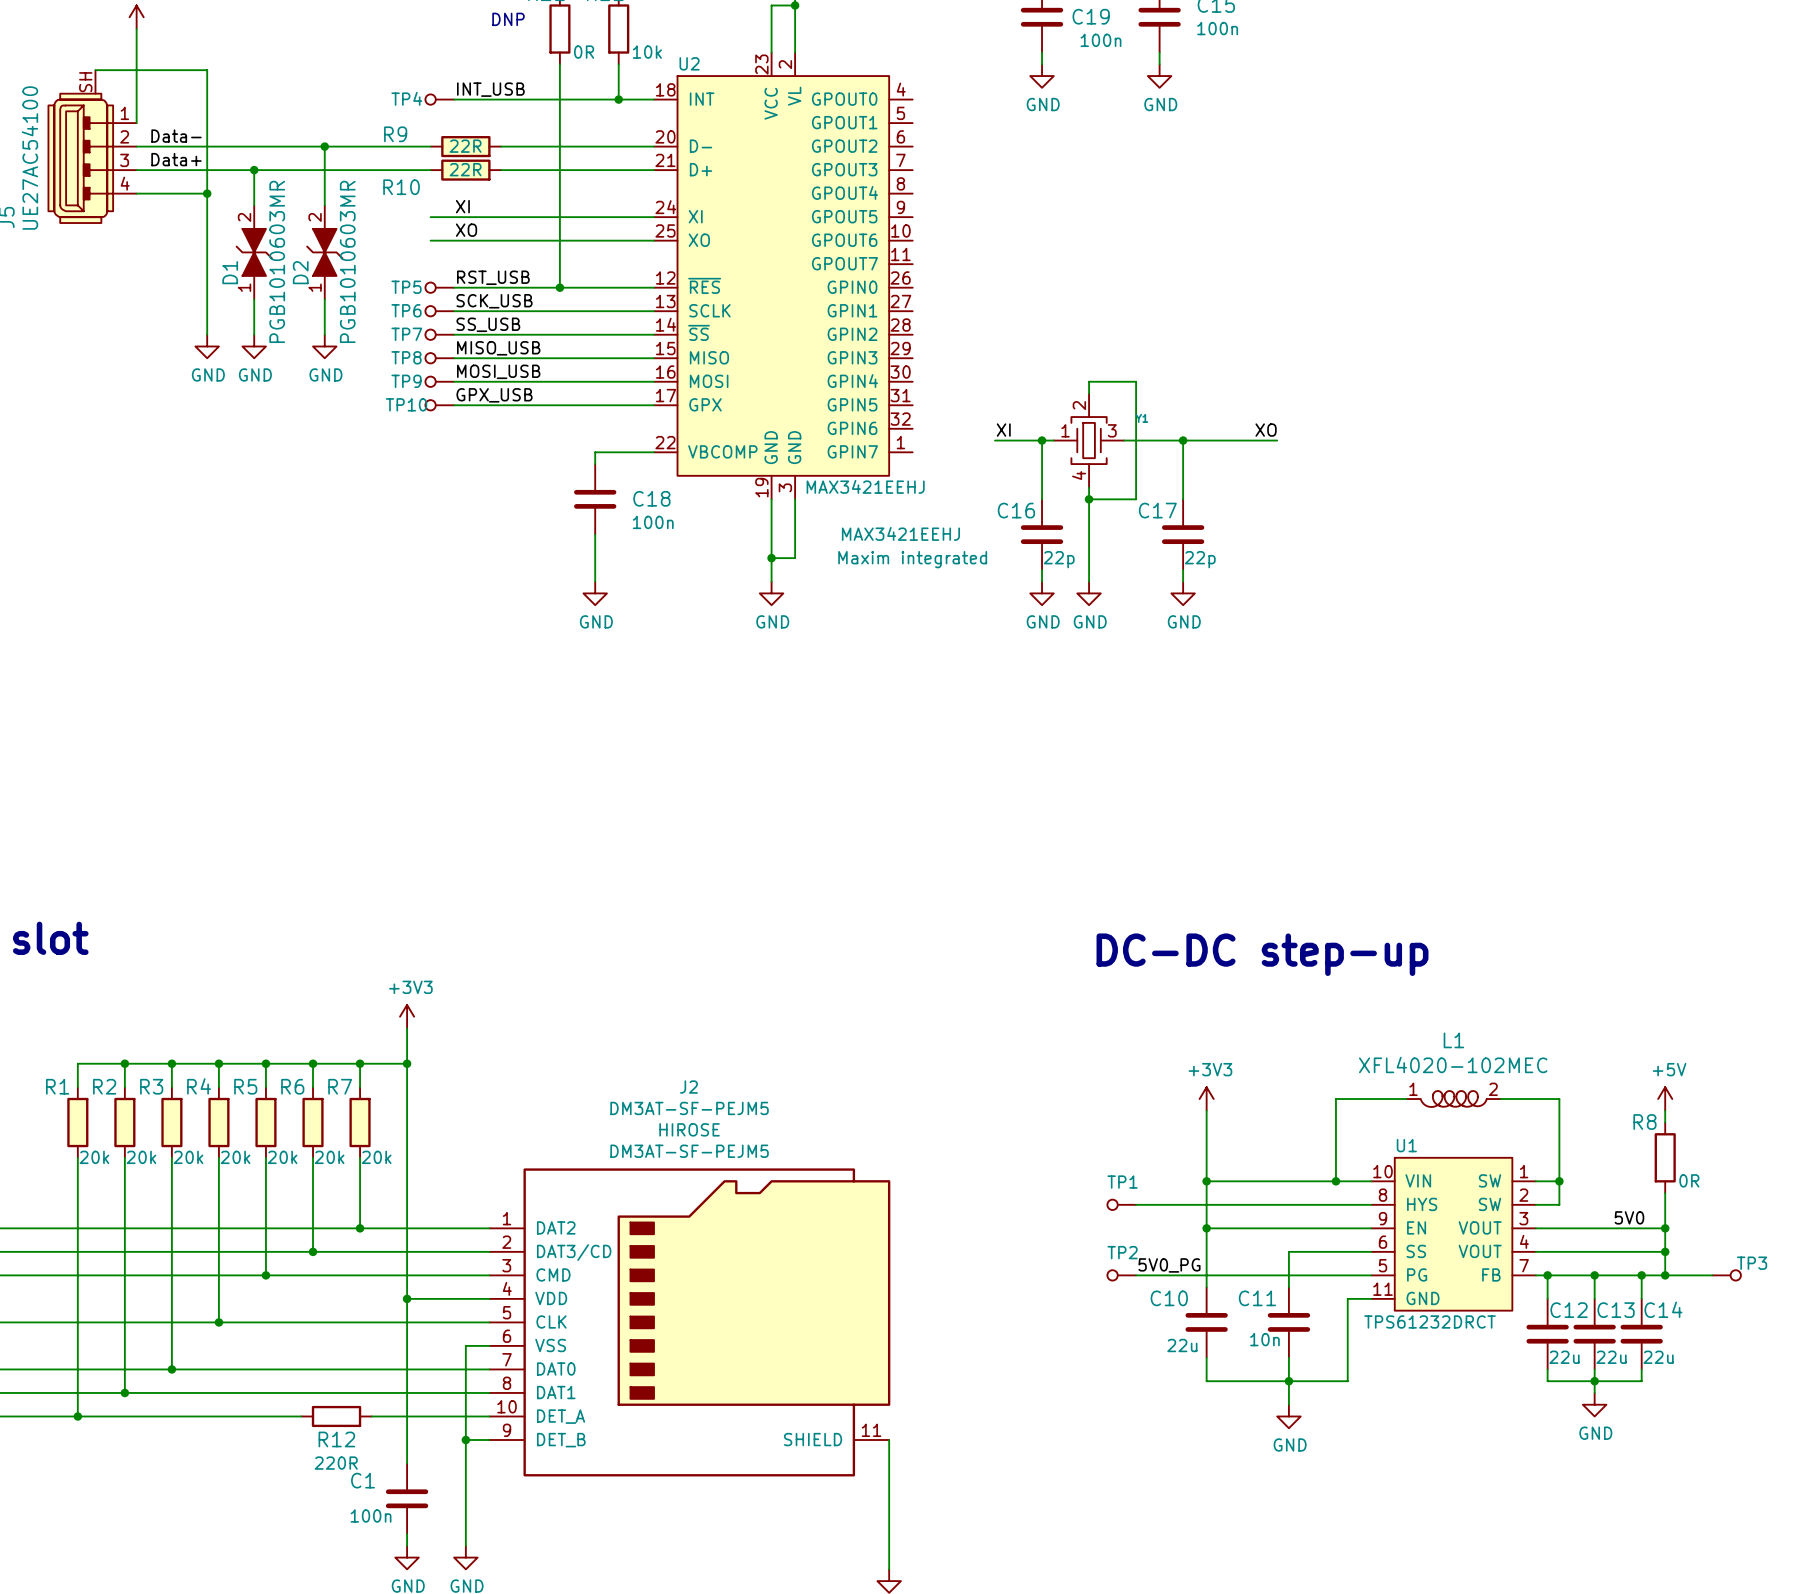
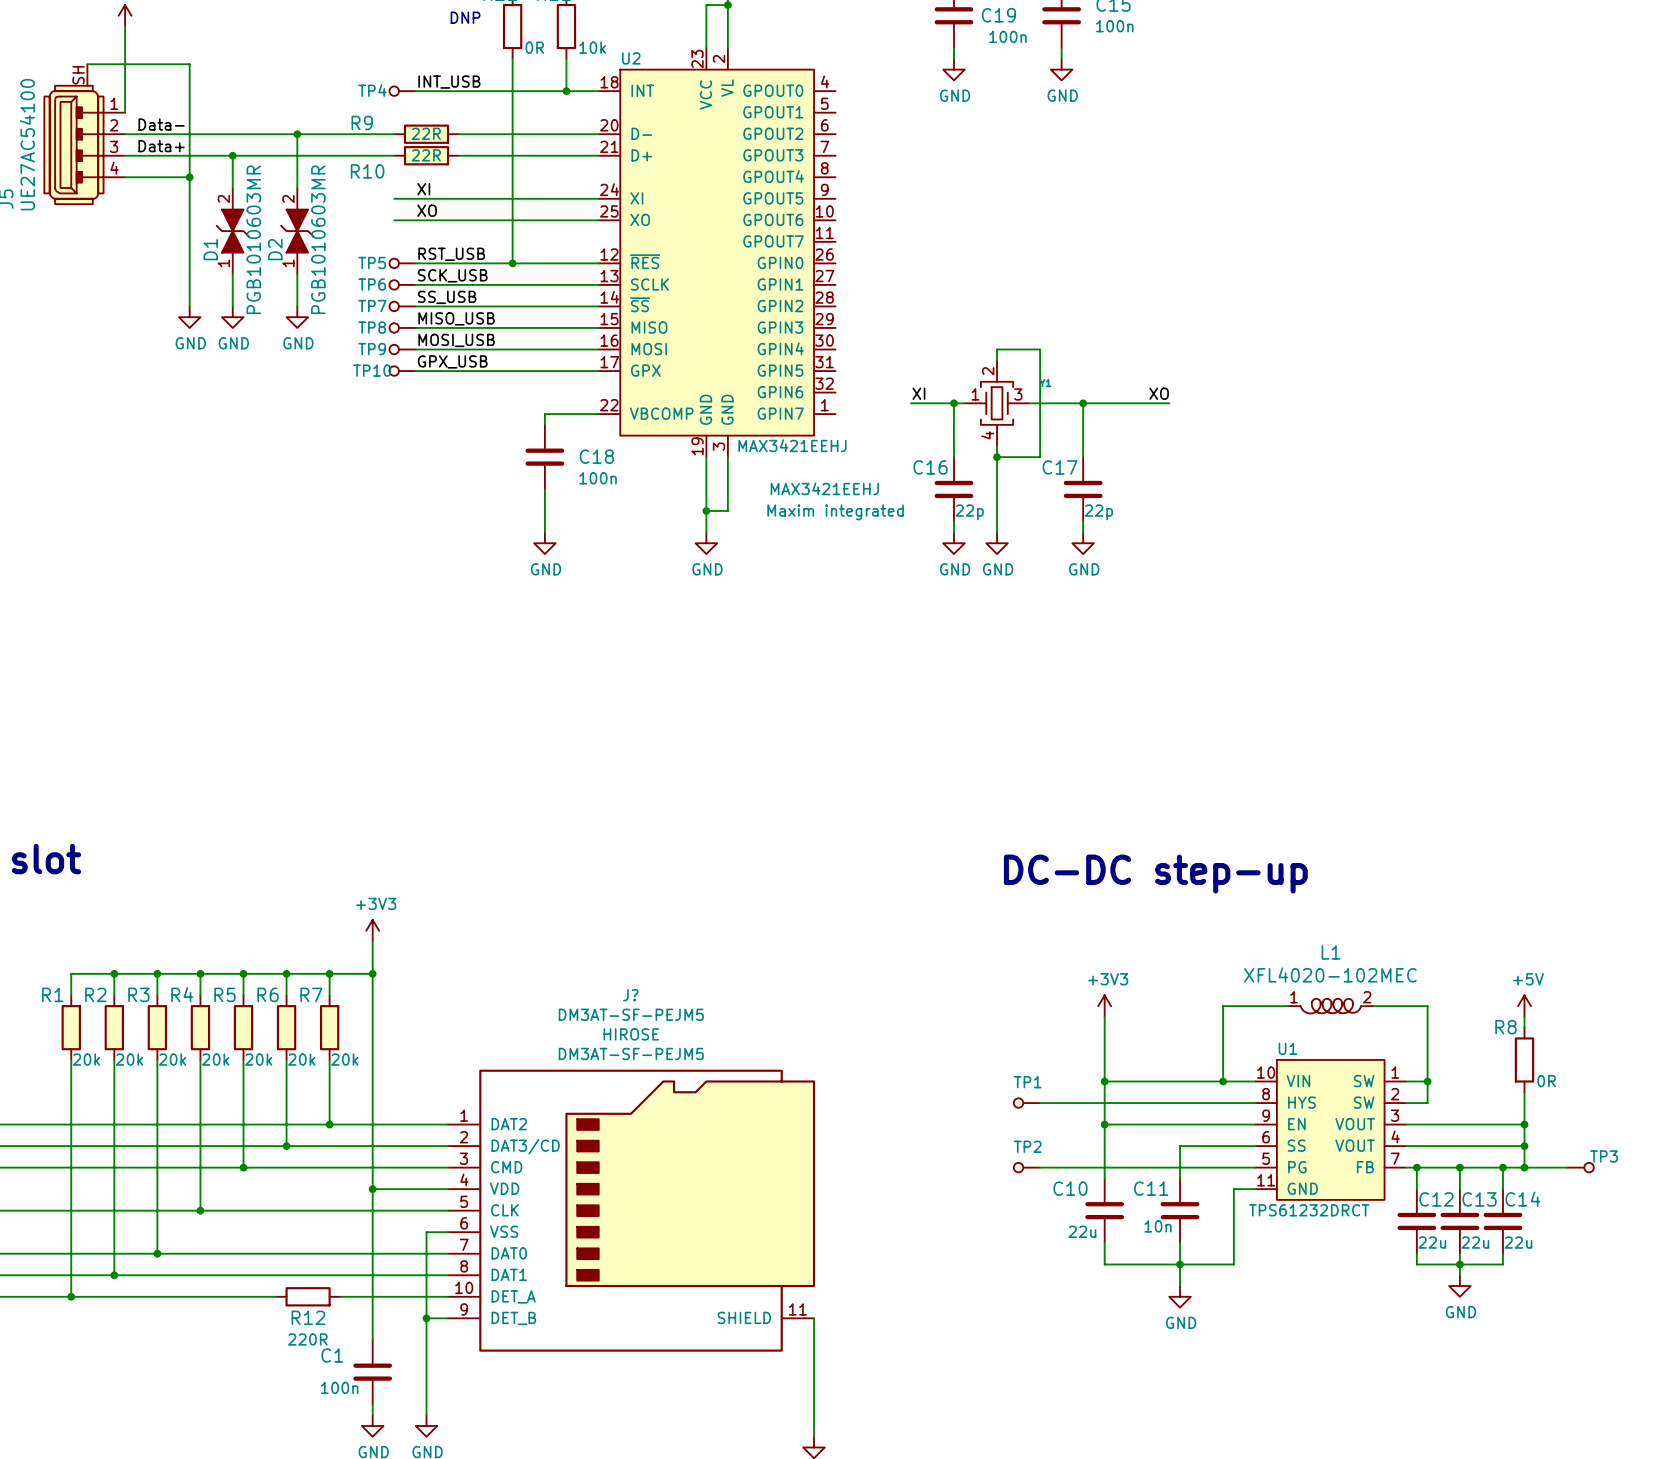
J2 name: J2 (688, 1087) -> J? (630, 995)
label: 5V0 (1629, 1217) -> none
label: 5V0_PG (1169, 1265) -> none

